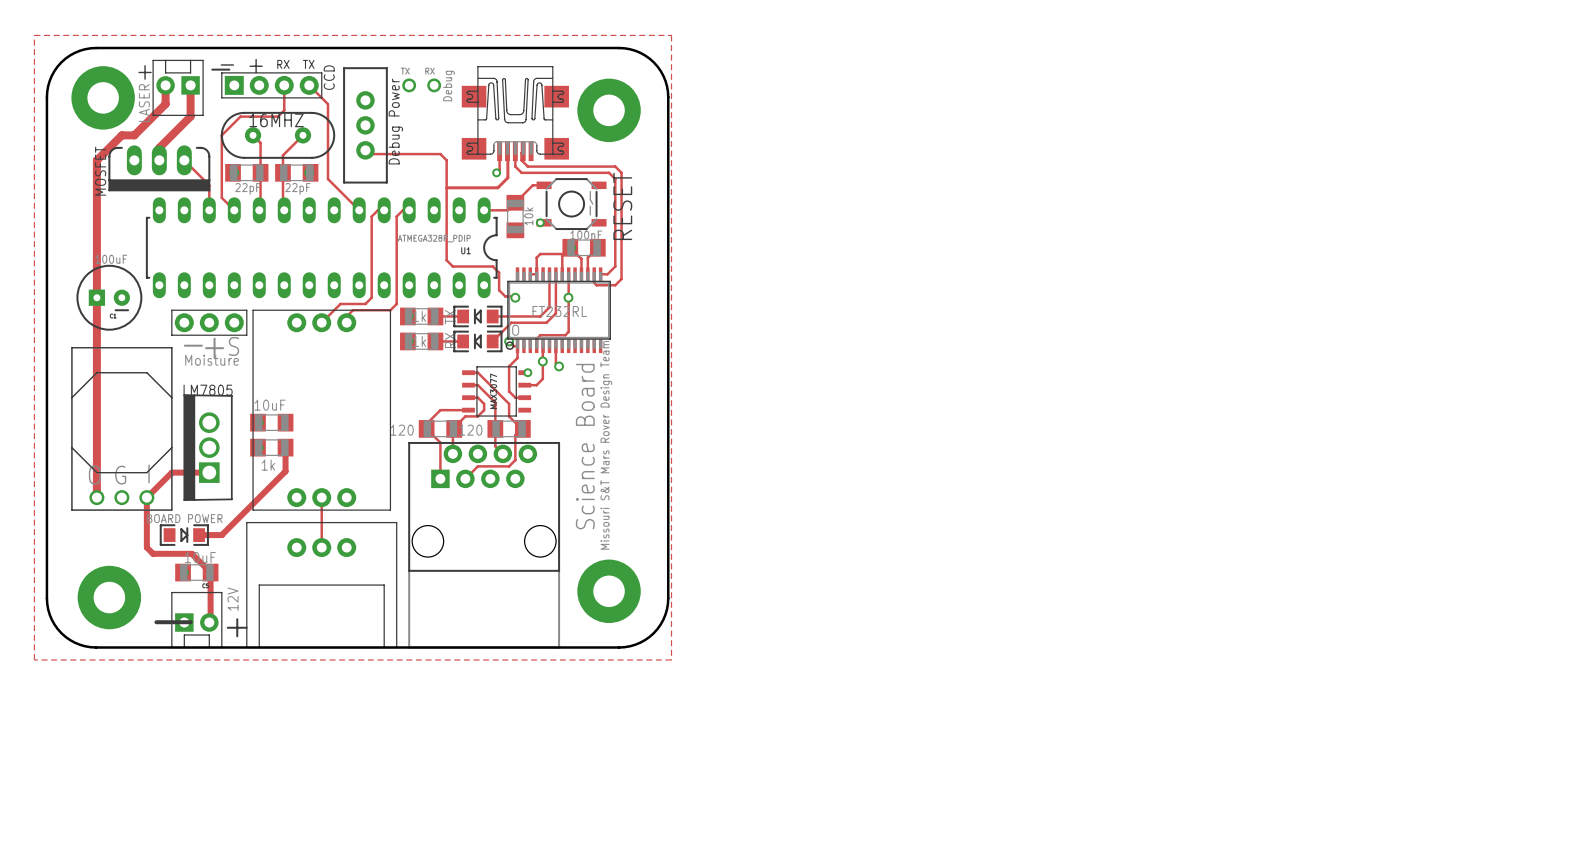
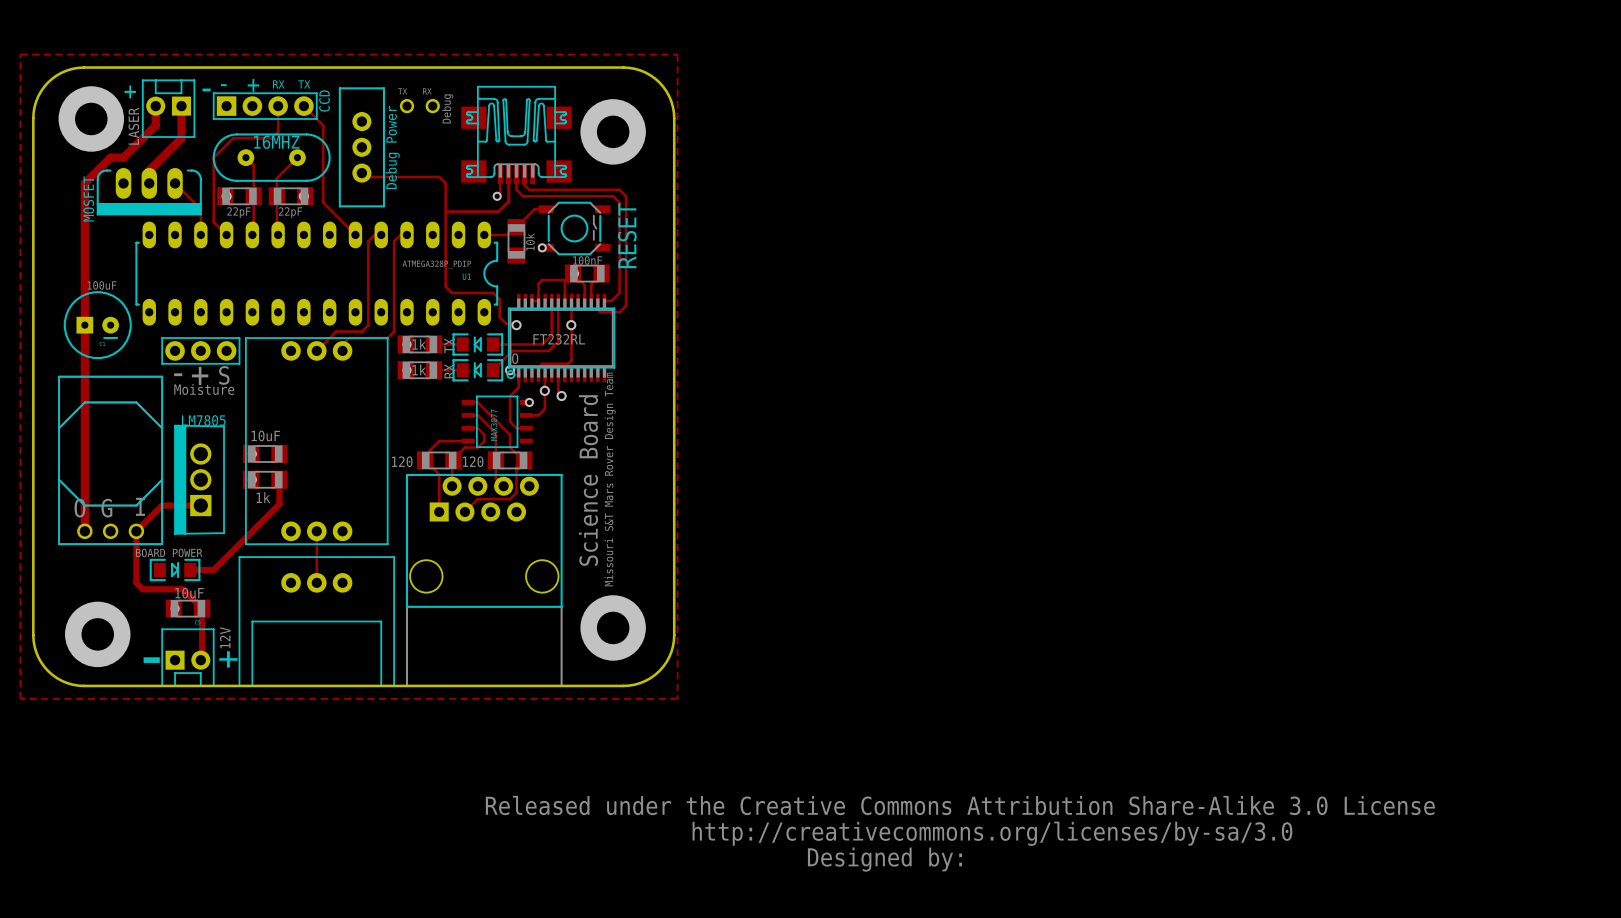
drawing: none -> [485, 795, 1435, 872]

